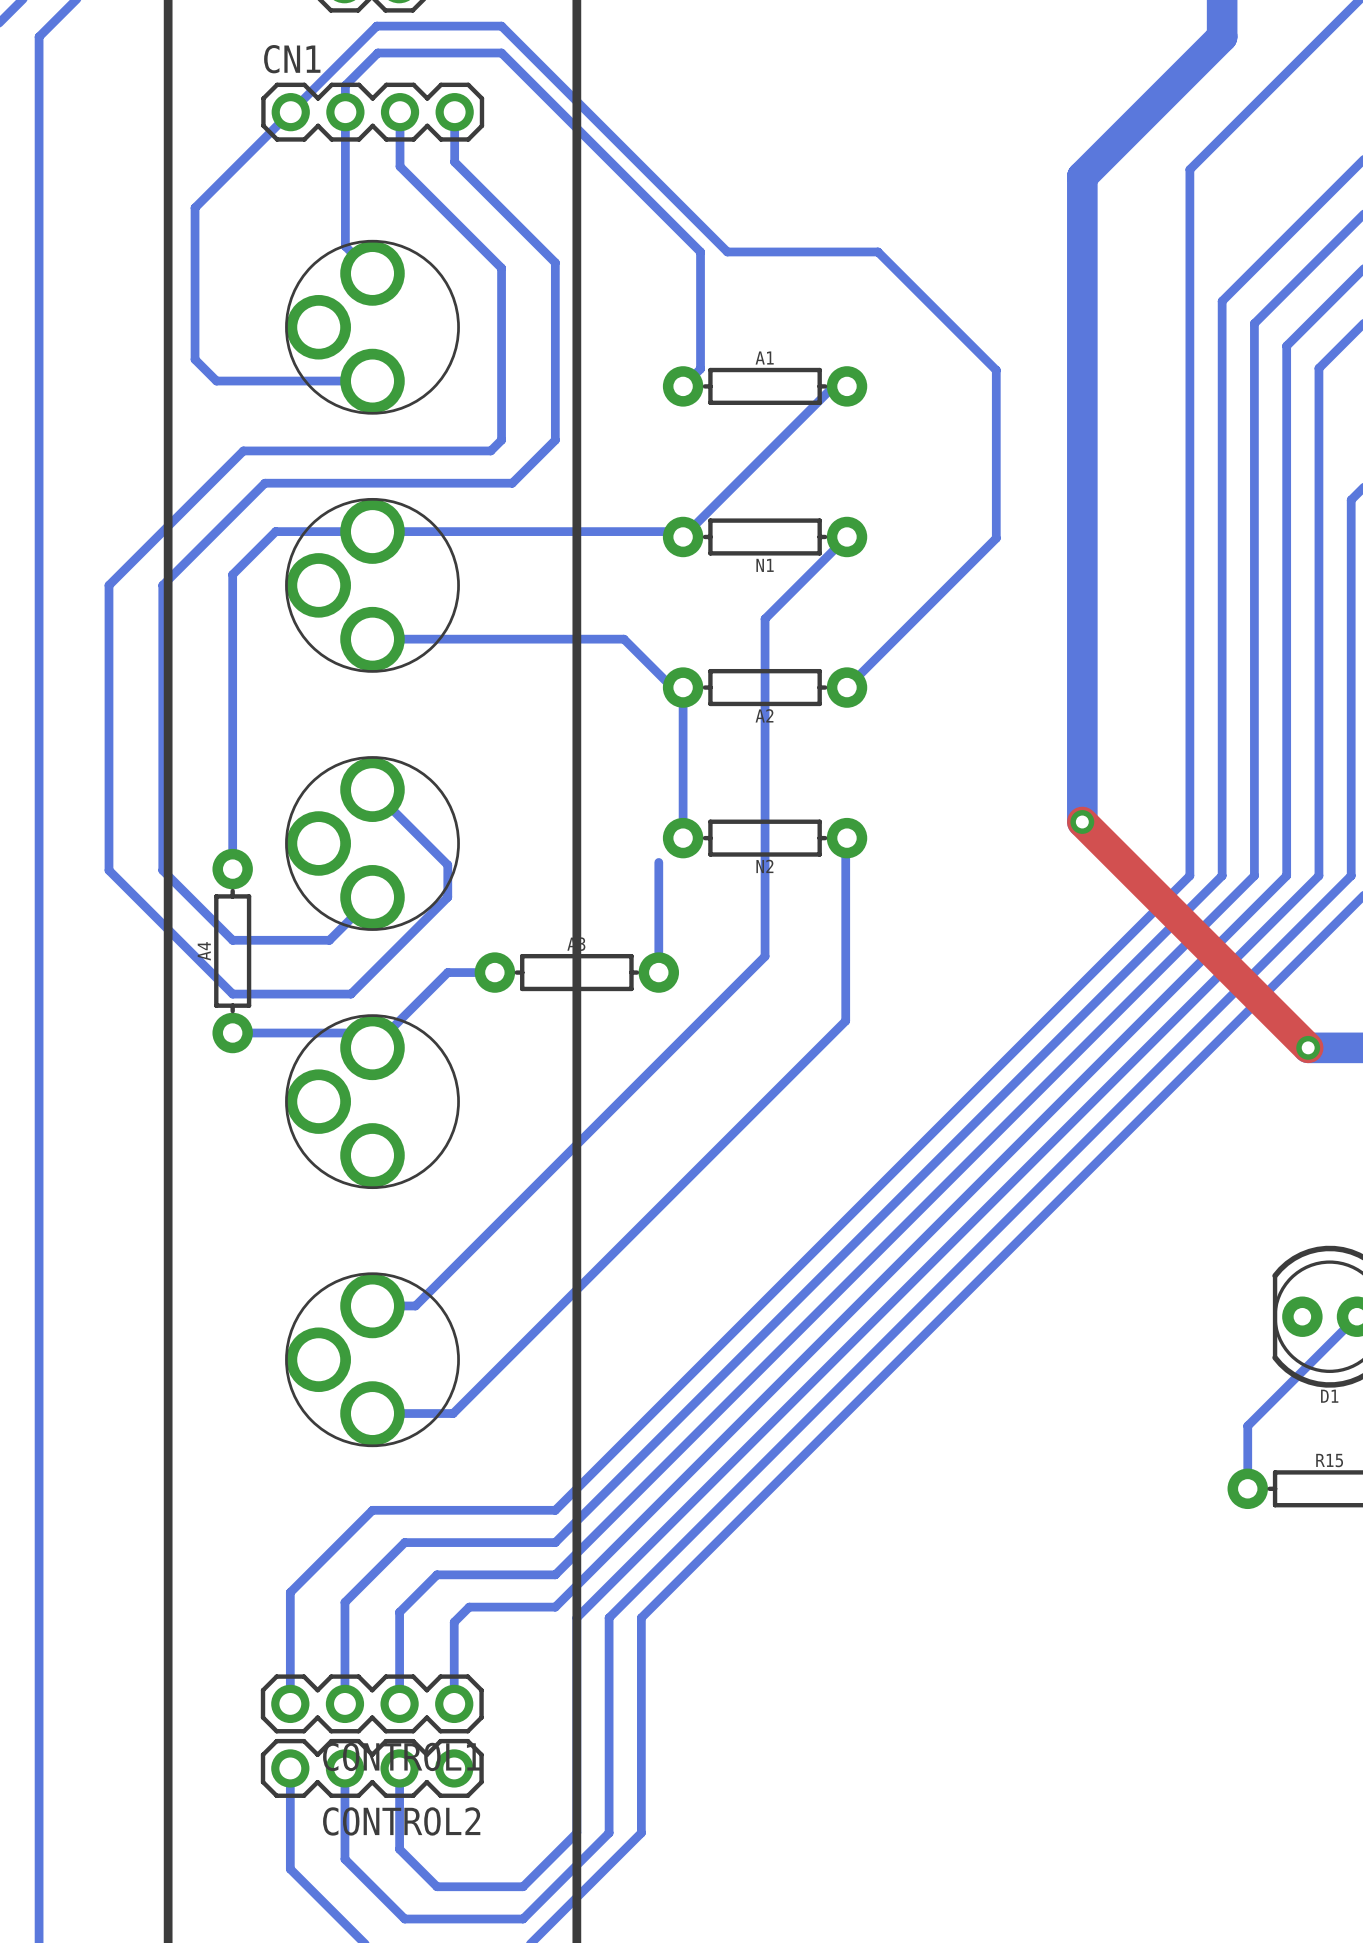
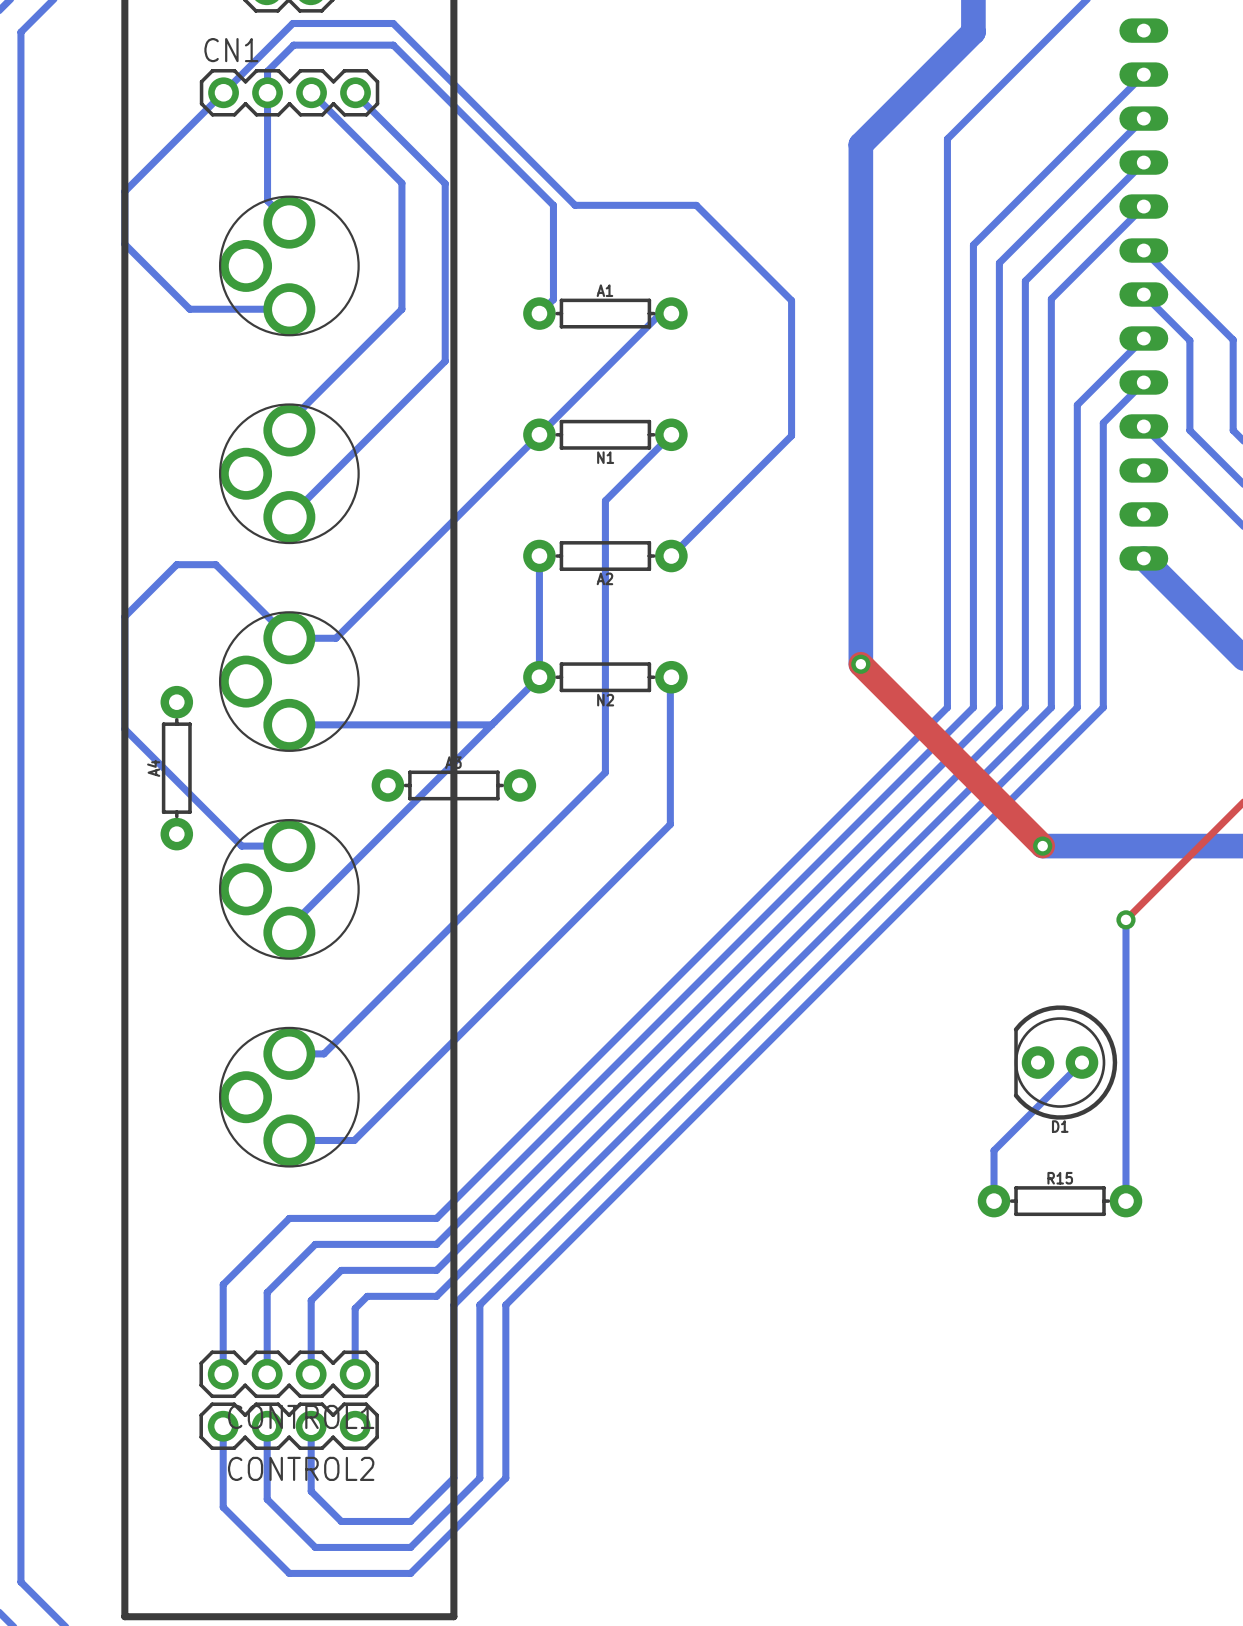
bottom track: (400, 112) (400, 166) (501, 268) (501, 440) (490, 450) (243, 450) (108, 585) (108, 870) (232, 994) (350, 994) (447, 897) (447, 865) (372, 789) -> (311, 92) (401, 183) (401, 309) (289, 421) (289, 430)
bottom track: (454, 113) (454, 162) (555, 262) (555, 440) (512, 483) (264, 483) (162, 585) (162, 870) (232, 940) (329, 940) (372, 897) -> (355, 93) (445, 183) (445, 361) (289, 517)
bottom track: (195, 207) (195, 359) (216, 381) (248, 381) -> (146, 169) (124, 191) (124, 244) (189, 309)
bottom track: (683, 536) (677, 531) (275, 531) (232, 574) (232, 869) -> (539, 434) (335, 638) (289, 638) (215, 564) (176, 564) (124, 616) (124, 729) (241, 846) (289, 846)
bottom track: (372, 639) (623, 639) (683, 698) -> none
bottom track: none -> (539, 677) (289, 927) (289, 932)
bottom track: (658, 862) (658, 972) -> none
bottom track: none -> (289, 724) (491, 724)
bottom track: (494, 972) (447, 972) (372, 1047) (357, 1033) (232, 1033) -> none

